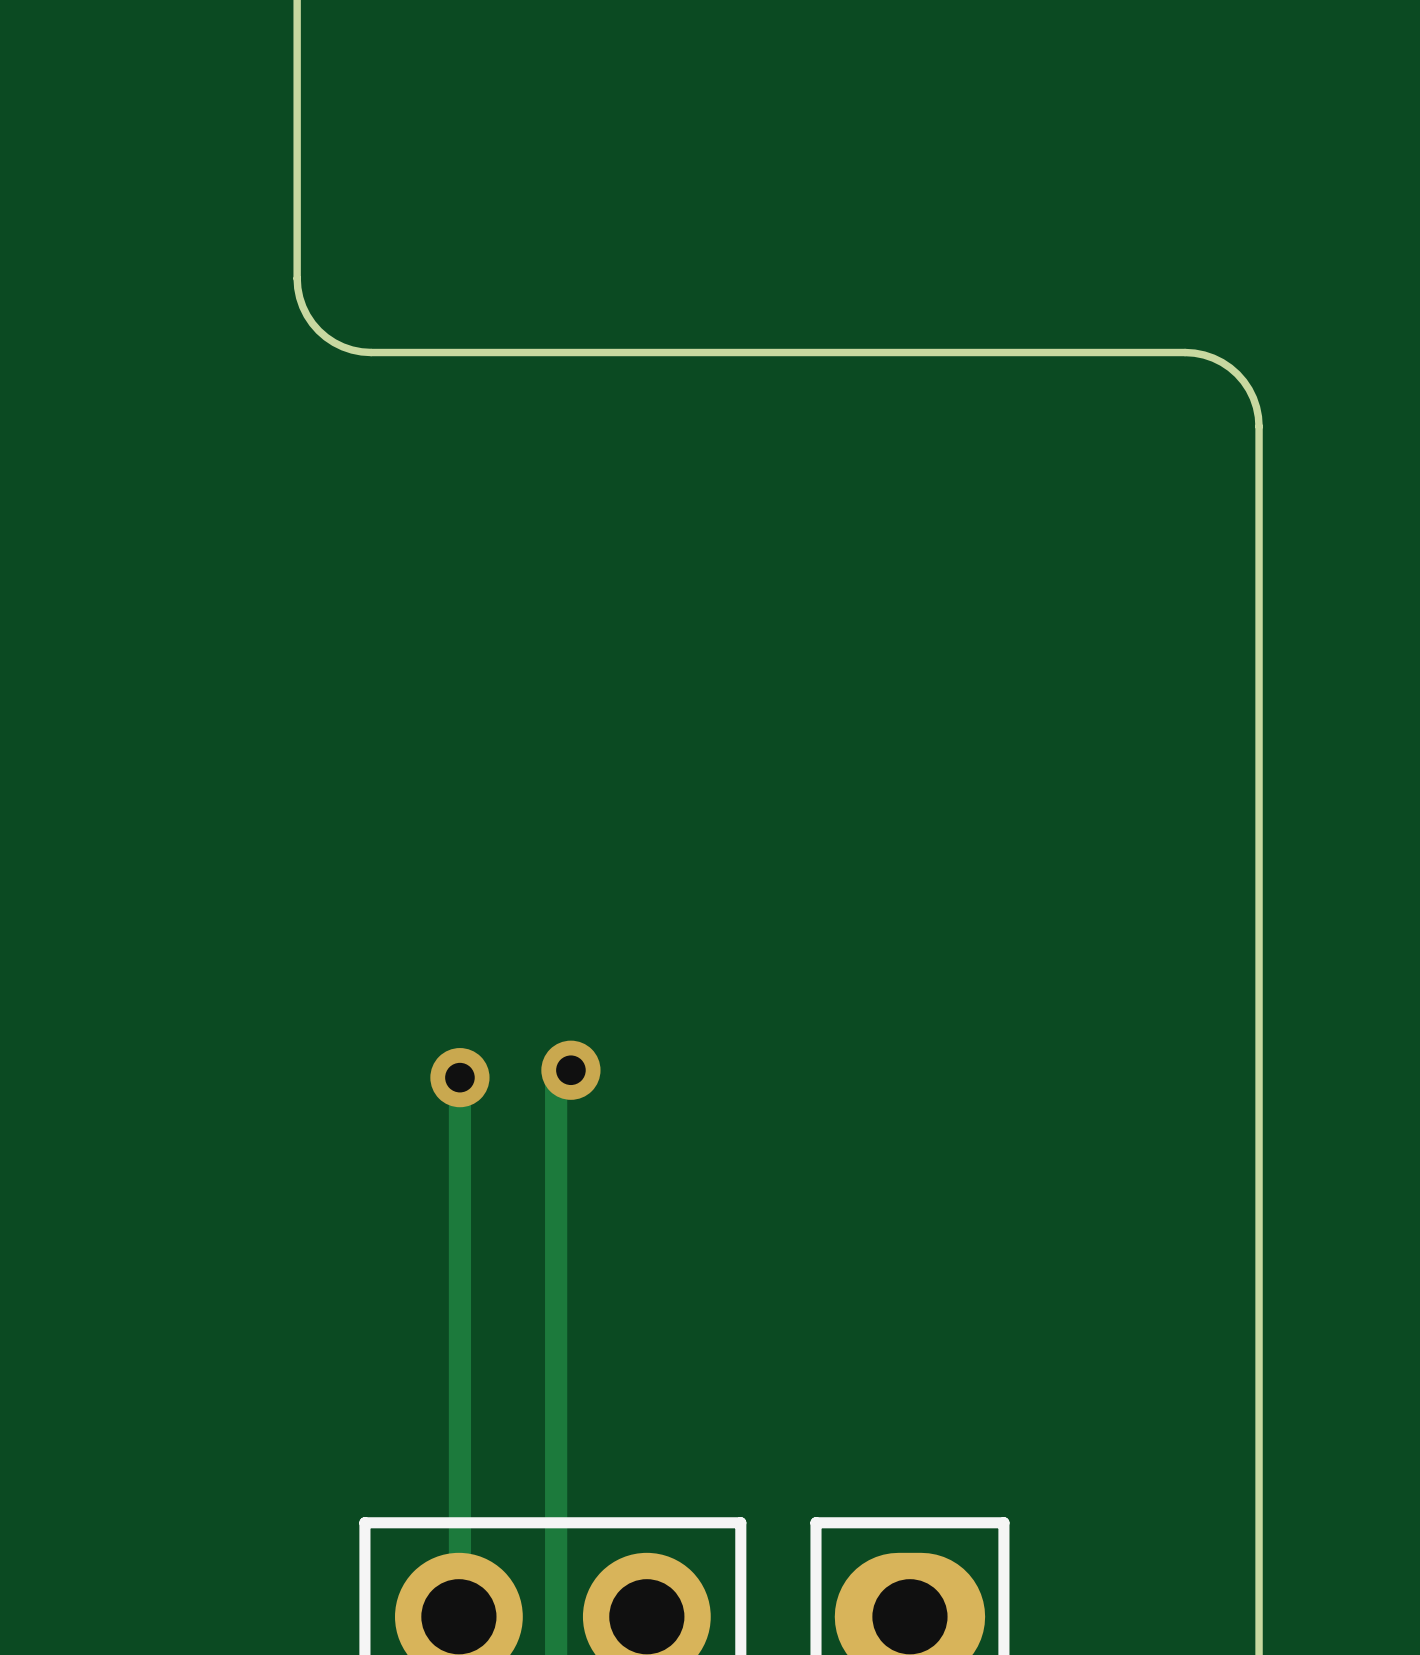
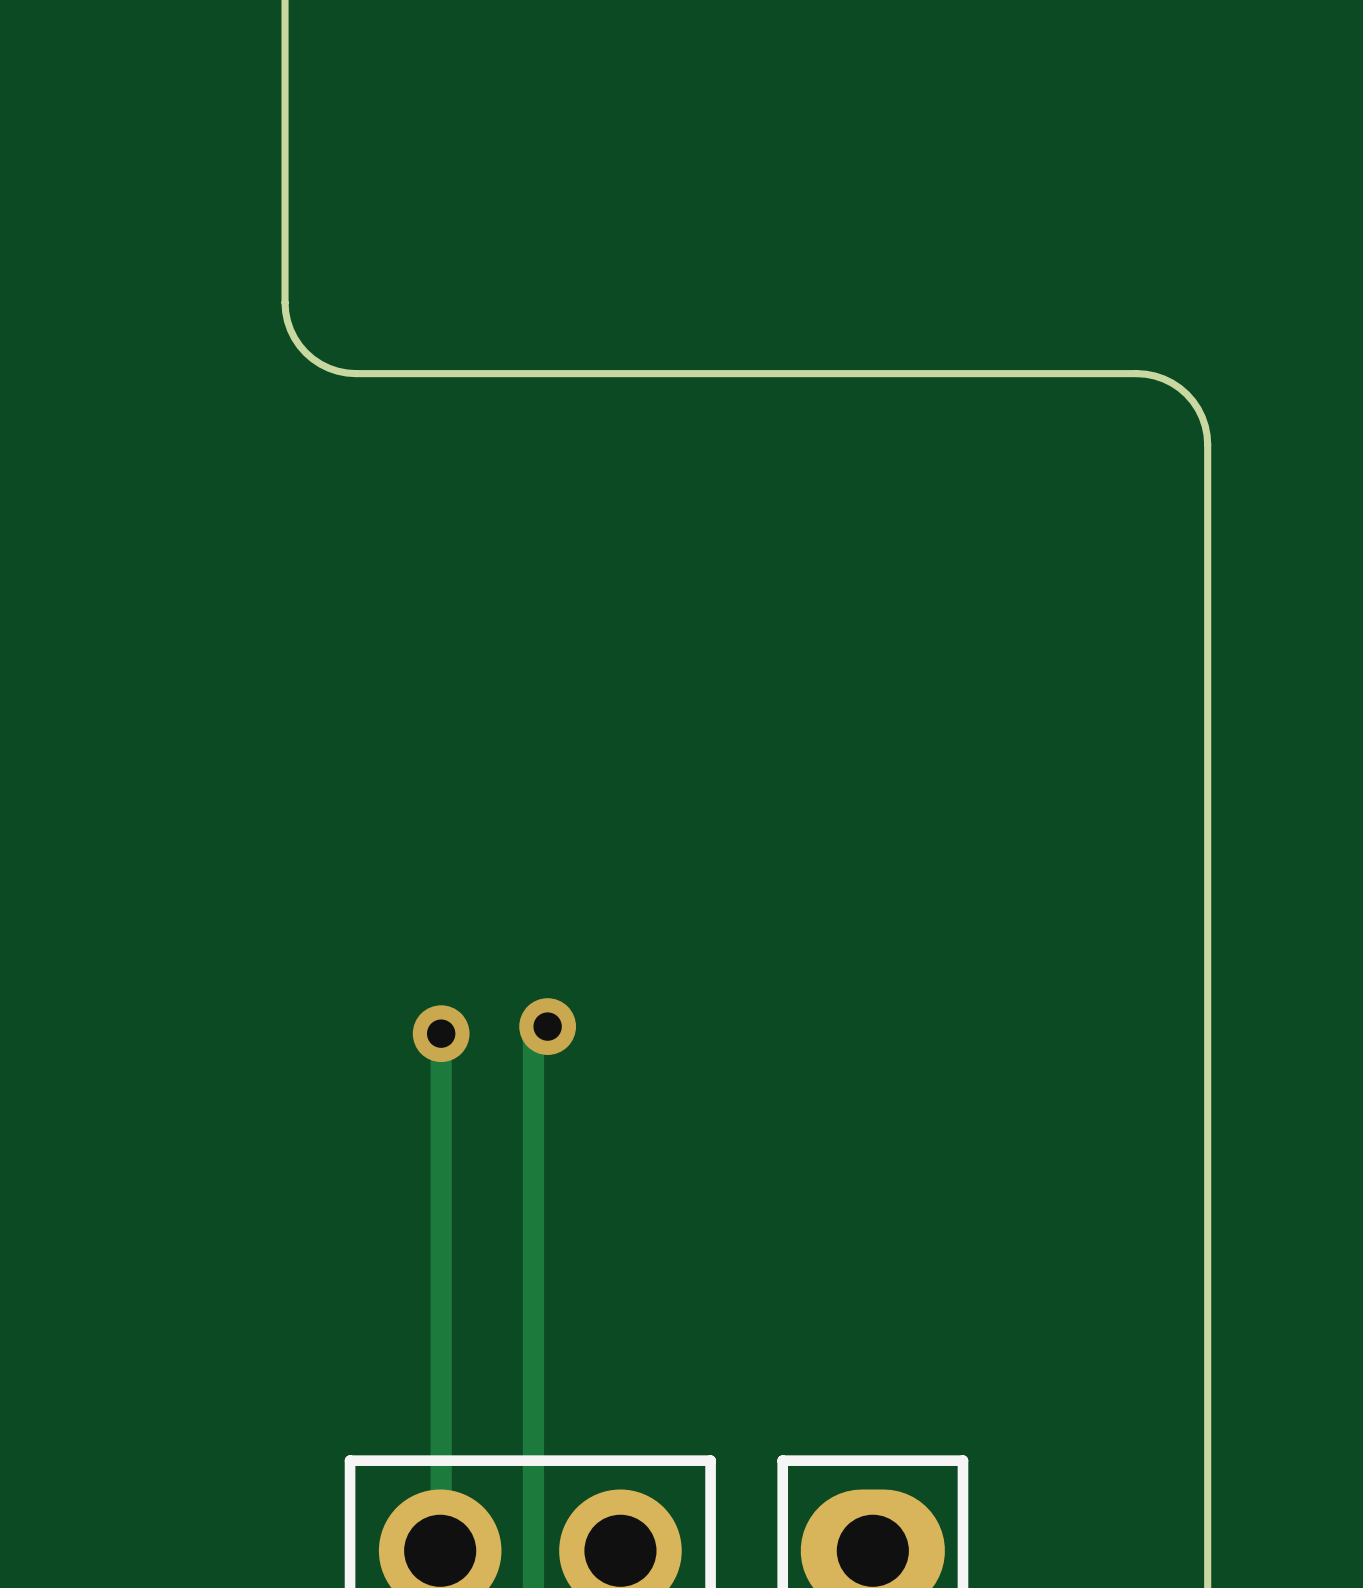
board edge: (297, 278) (299, 297) (312, 323) (334, 342) (361, 351) (1194, 353) (1213, 358) (1230, 367) (1249, 389) (1258, 416) (1259, 463) -> (285, 267) (285, 311) (294, 338) (312, 358) (328, 368) (346, 373) (1145, 374) (1172, 383) (1193, 401) (1205, 426) (1207, 444)

